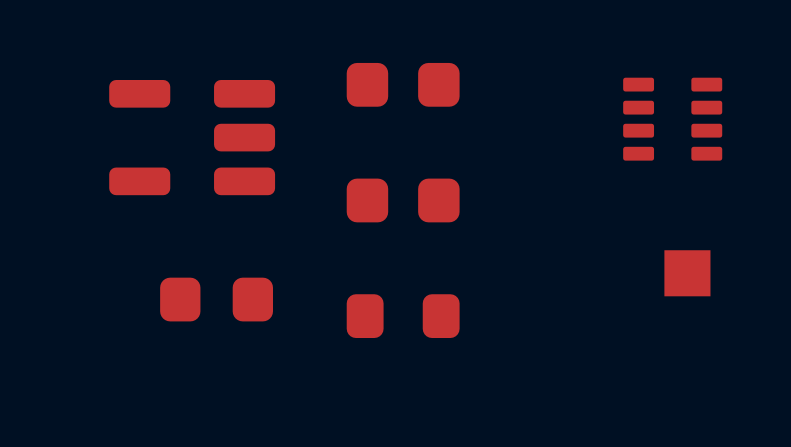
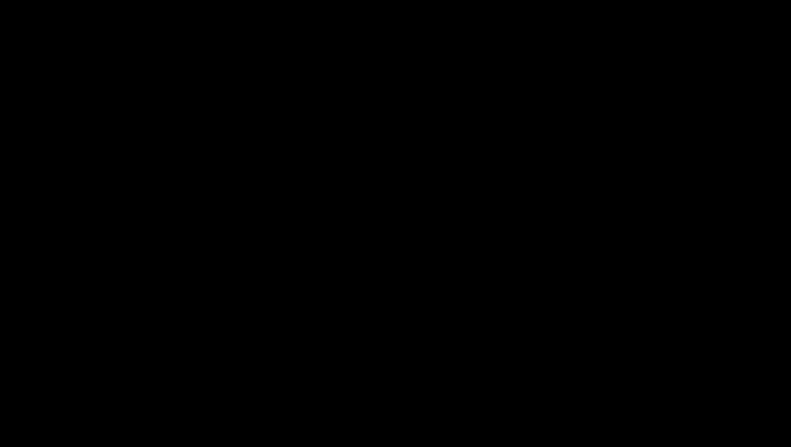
part: (403, 84) -> none
part: (672, 119) -> none
part: (192, 137) -> none
part: (403, 200) -> none
part: (687, 273) -> none
part: (216, 299) -> none
part: (403, 316) -> none

